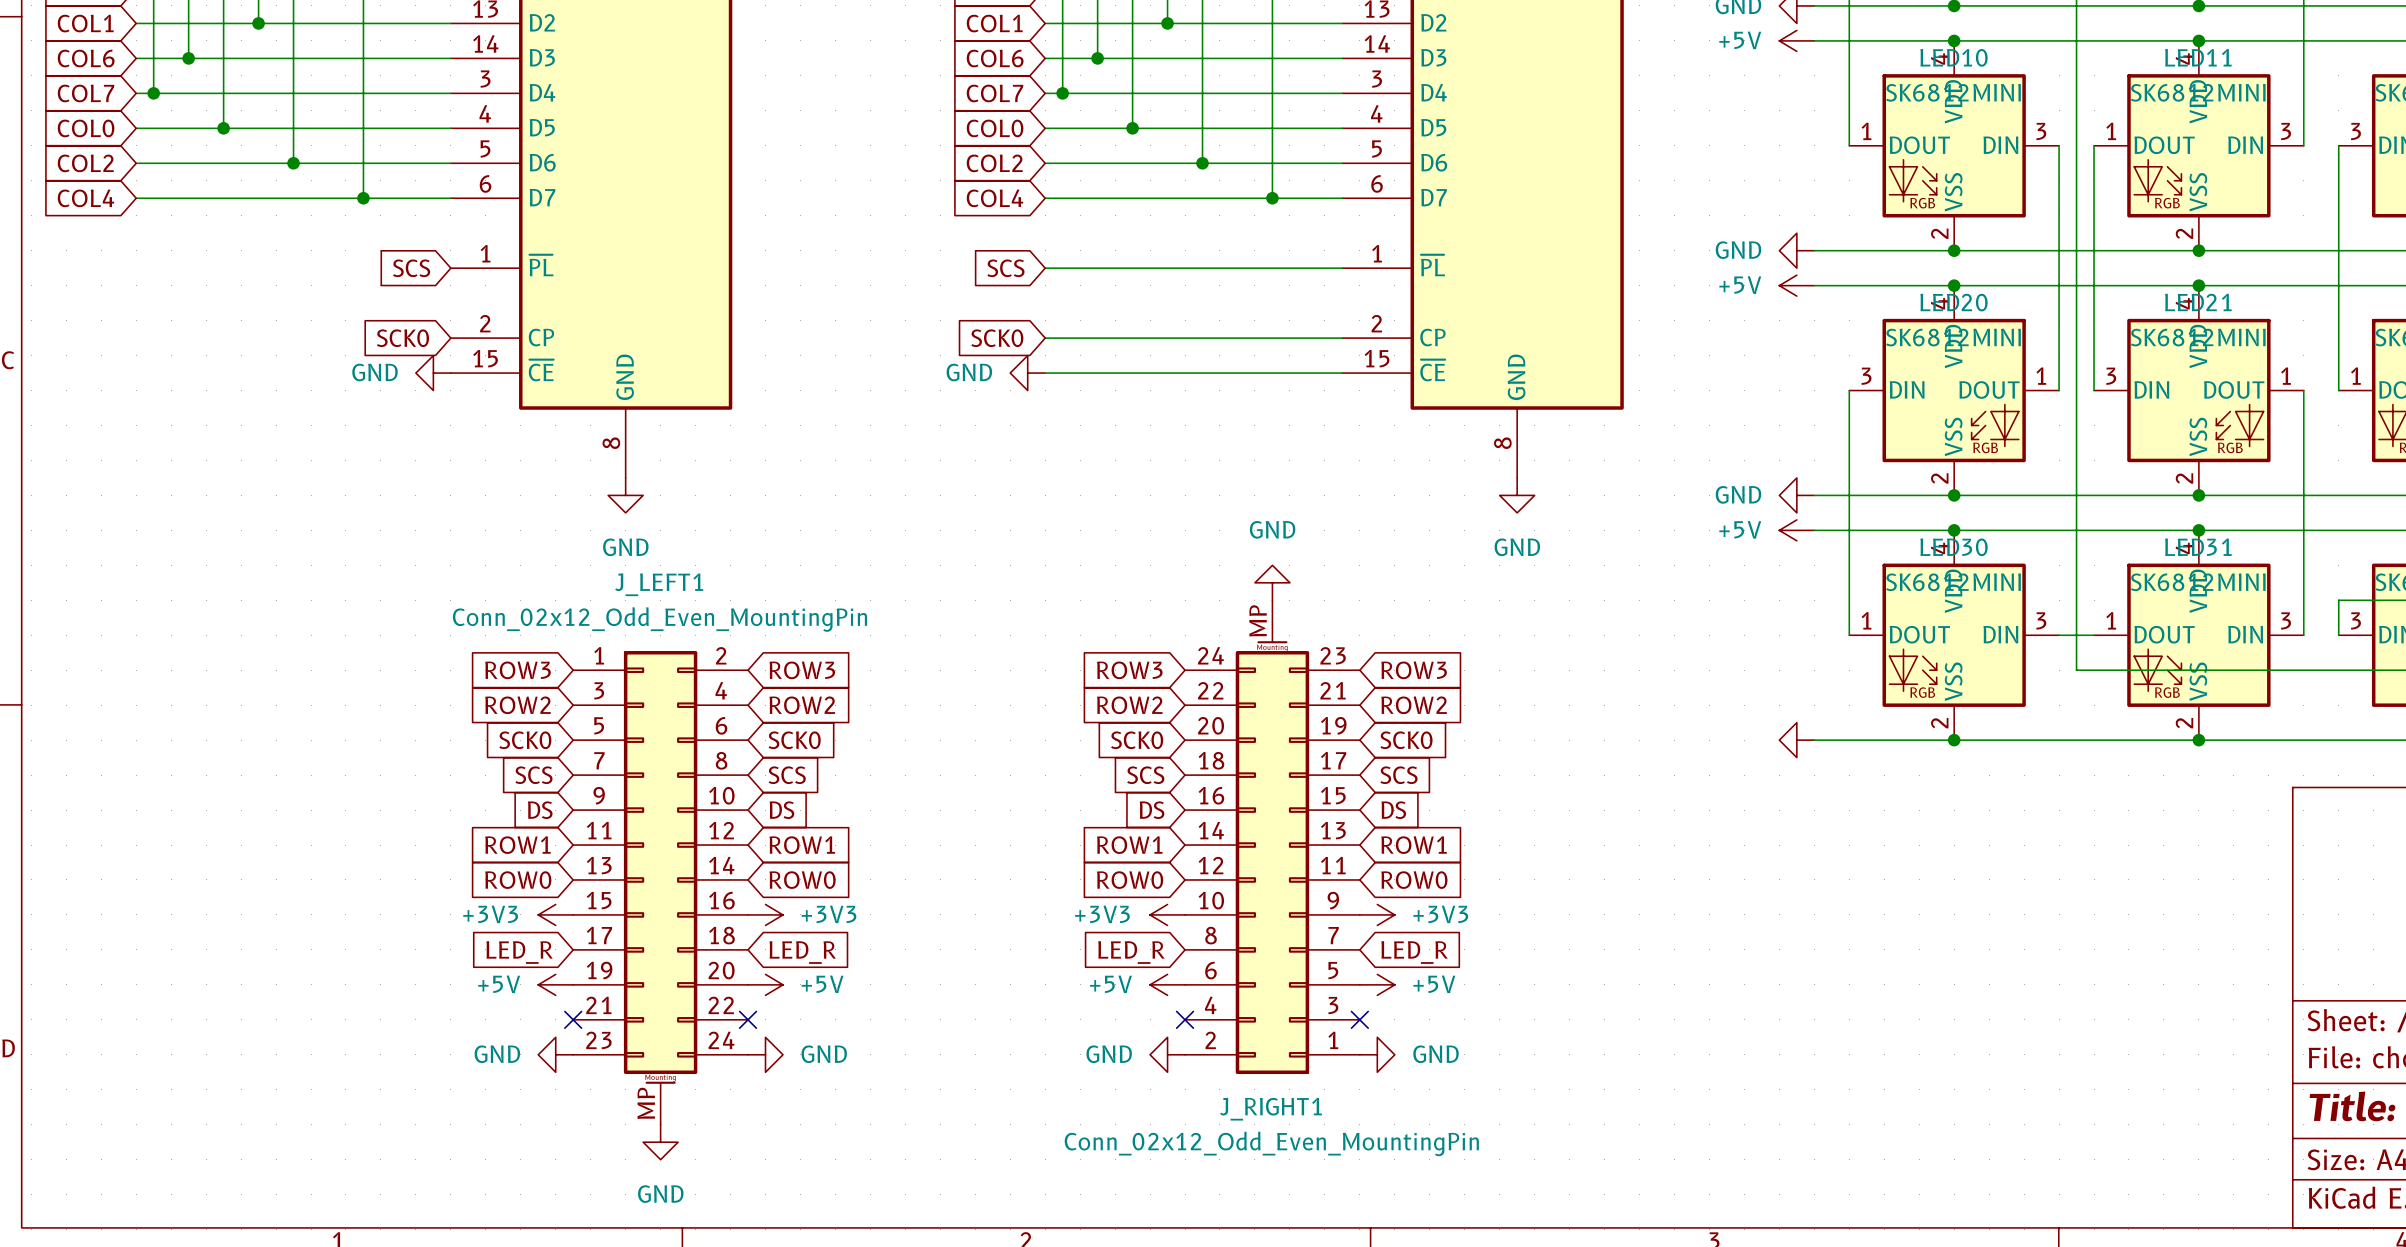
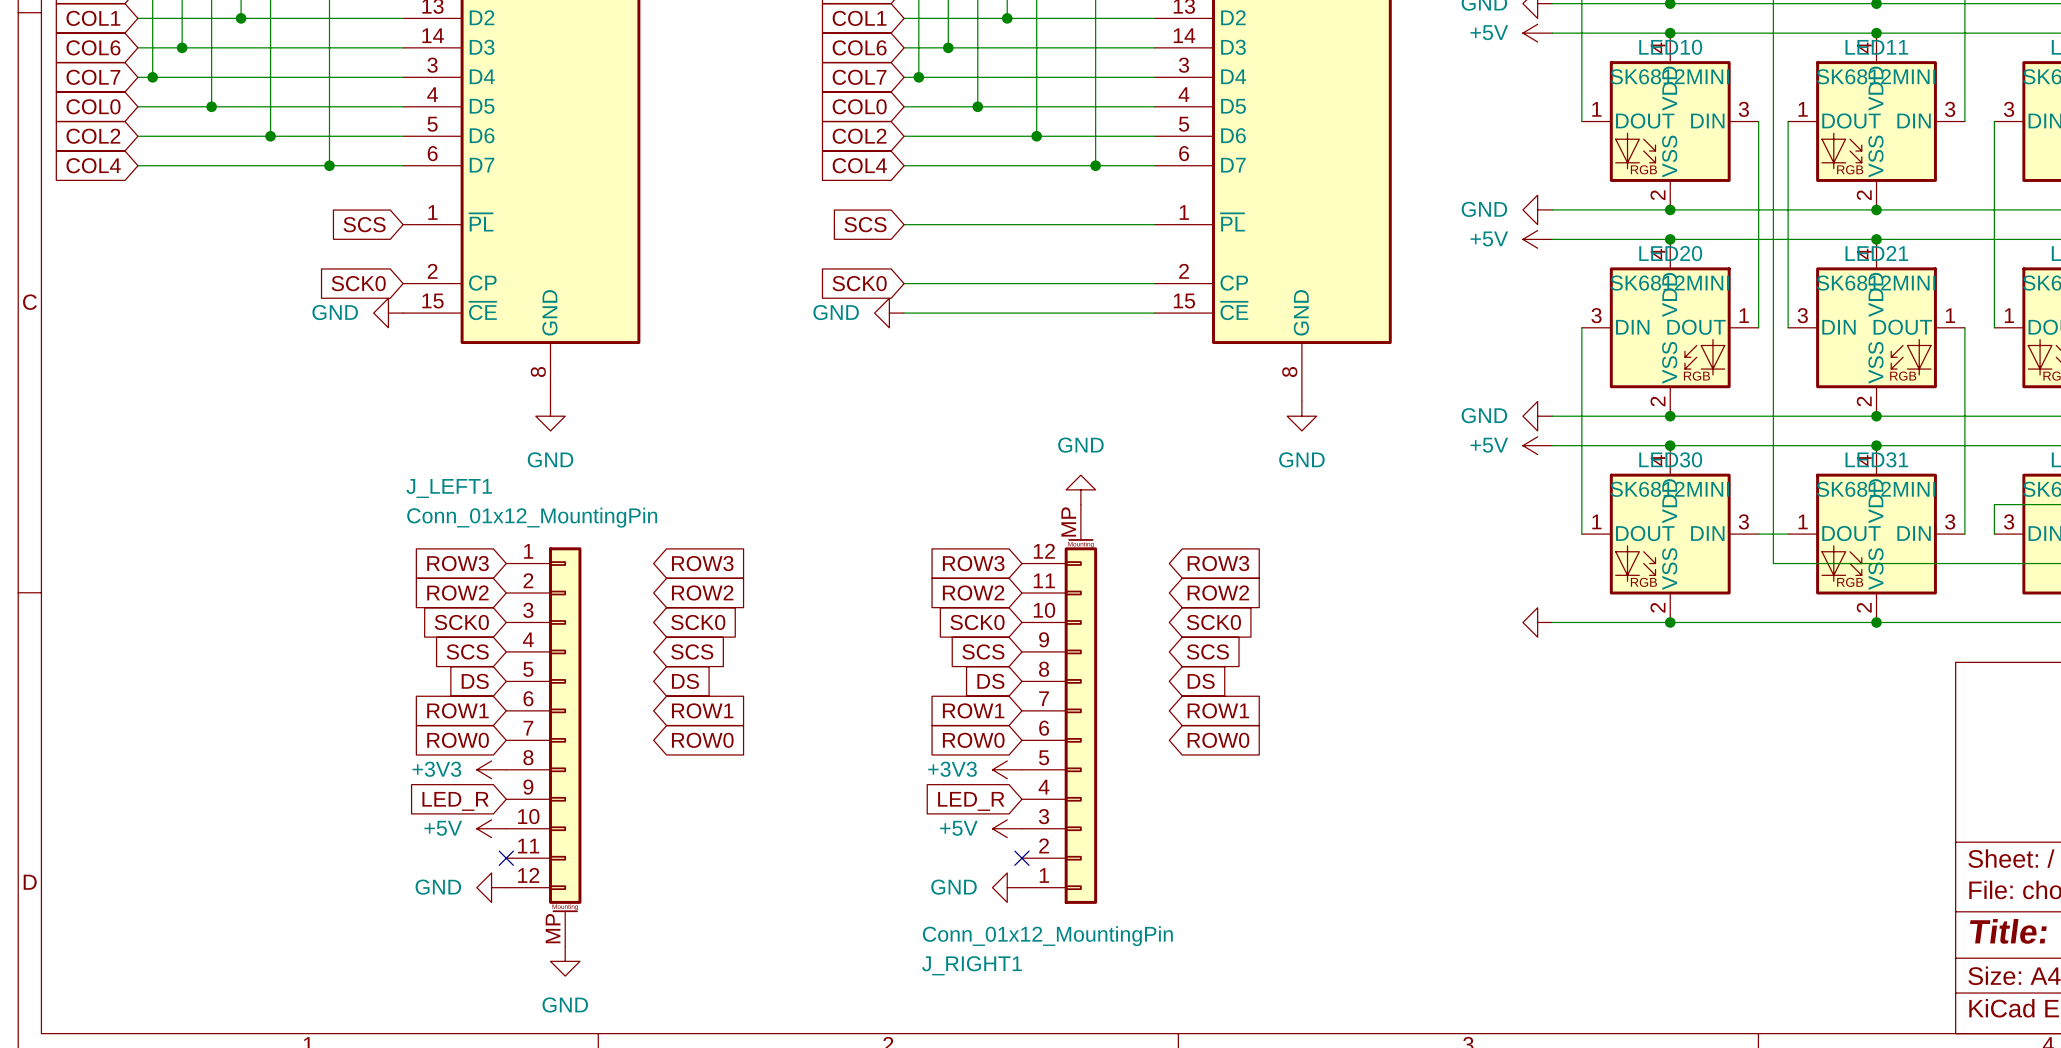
power symbol position: GND (1272, 582) -> GND (1080, 489)
J_LEFT1 name position: J_LEFT1 (659, 584) -> J_LEFT1 (449, 488)
J_RIGHT1 symbol: [1185, 600, 1360, 1075] -> [1021, 504, 1098, 904]
J_LEFT1 value: Conn_02x12_Odd_Even_MountingPin (659, 619) -> Conn_01x12_MountingPin (532, 517)
J_LEFT1 symbol: [573, 650, 749, 1125] -> [506, 547, 582, 947]
power symbol: +3V3 (765, 914) -> none
power symbol: +3V3 (1377, 914) -> none
global label: LED_R (802, 952) -> none
global label: LED_R (1414, 952) -> none
power symbol: +5V (765, 984) -> none
power symbol: +5V (1377, 984) -> none
no-connect mark: (748, 1019) -> none
no-connect mark: (1359, 1019) -> none
power symbol: GND (765, 1054) -> none
power symbol: GND (1377, 1054) -> none
J_RIGHT1 name position: J_RIGHT1 (1270, 1109) -> J_RIGHT1 (972, 965)
power symbol position: GND (660, 1142) -> GND (565, 961)
J_RIGHT1 value: Conn_02x12_Odd_Even_MountingPin (1271, 1143) -> Conn_01x12_MountingPin (1047, 936)

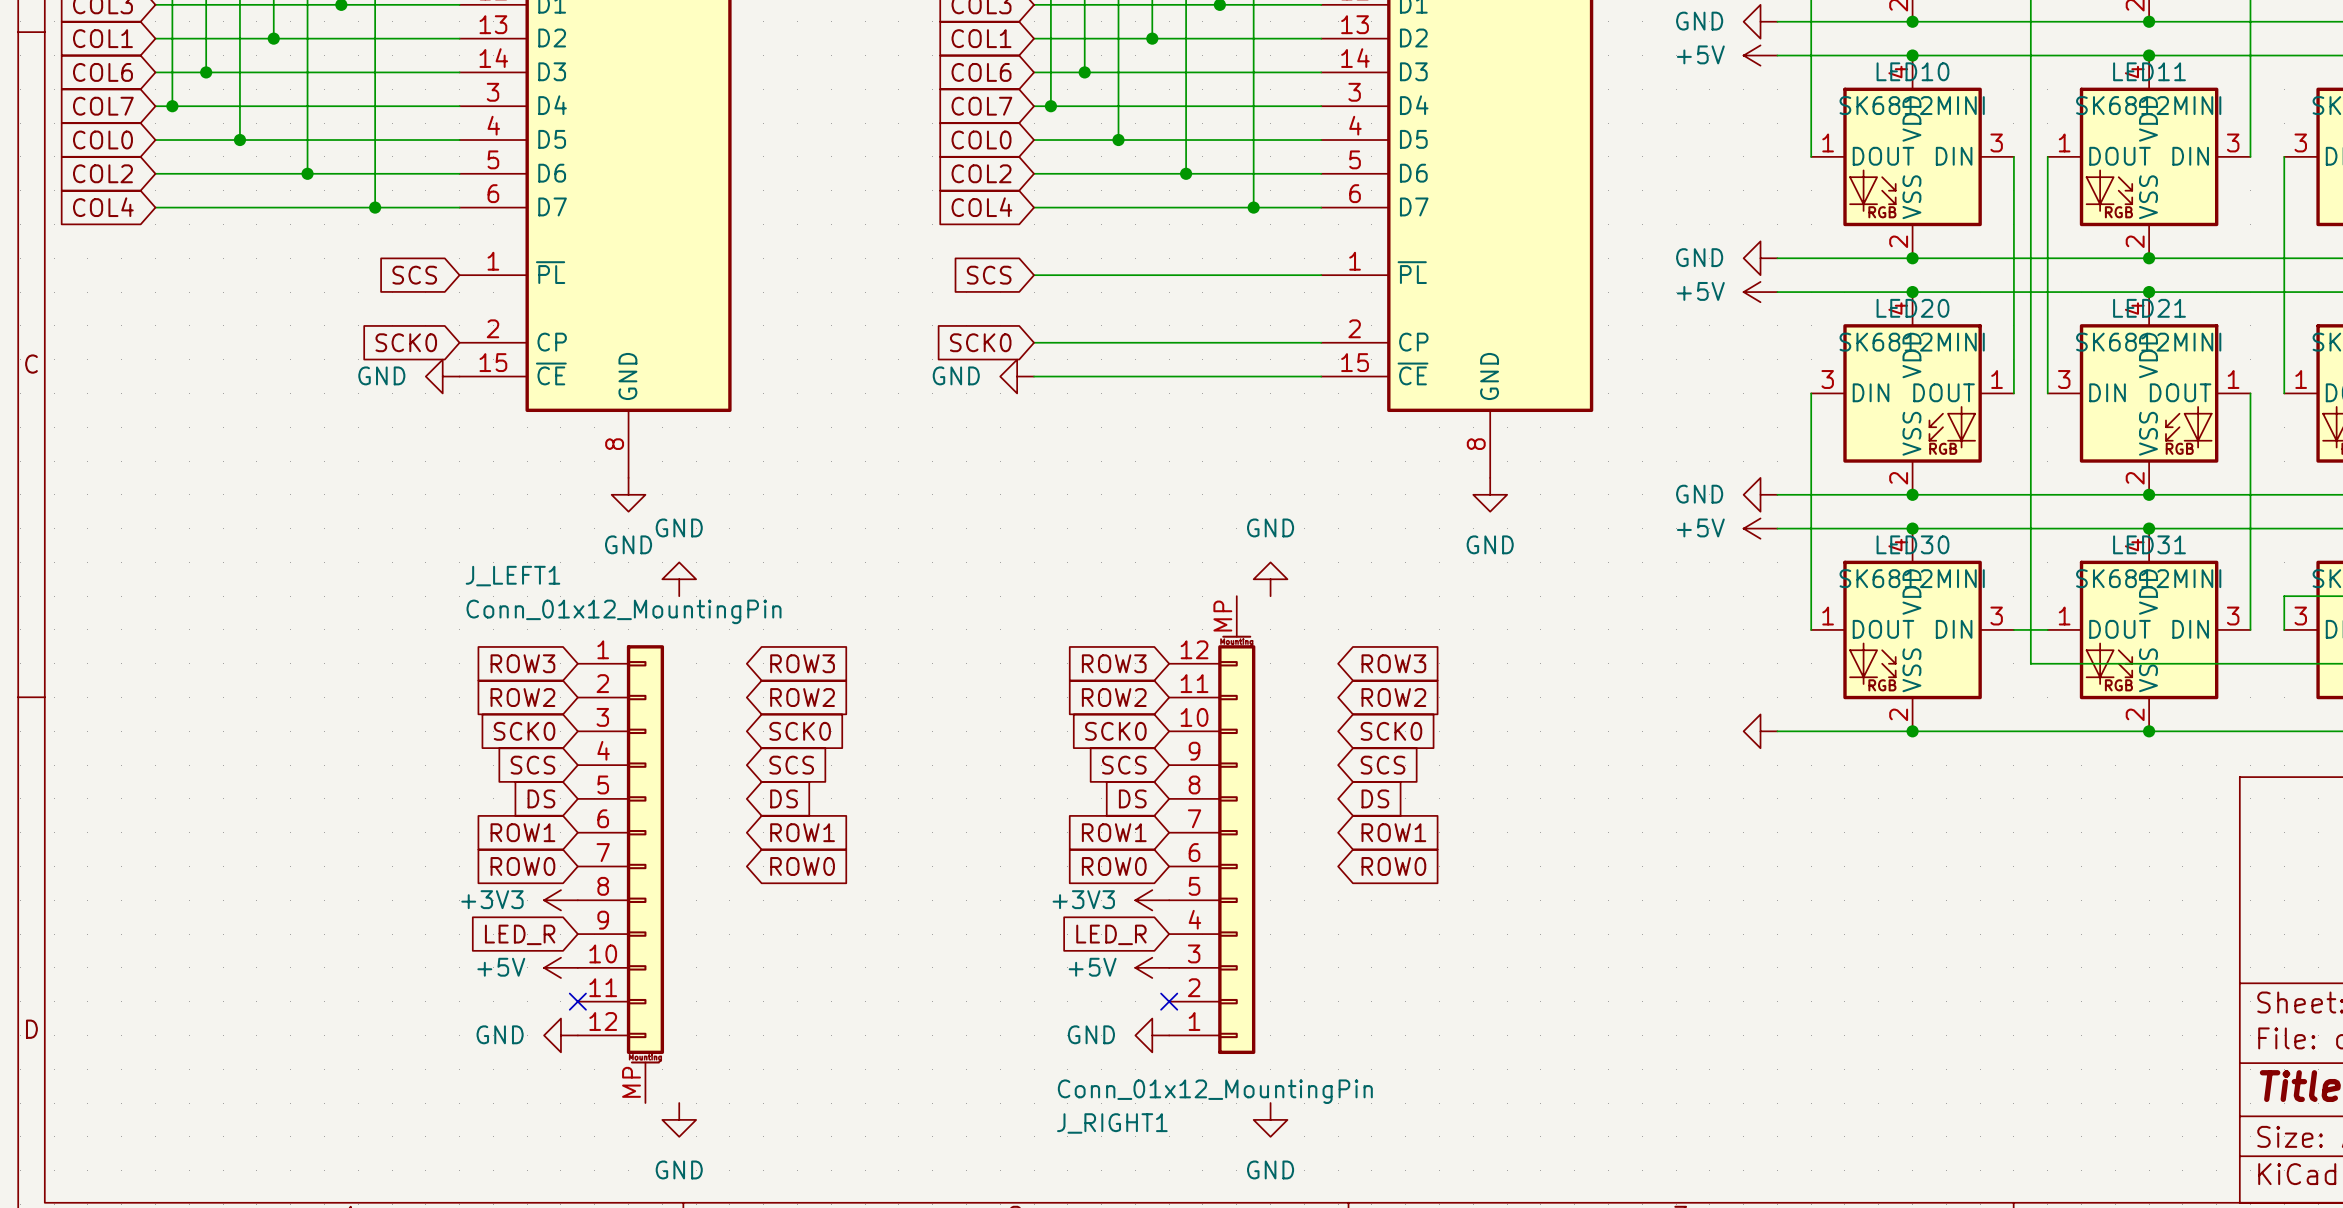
power symbol: none -> GND (679, 579)
power symbol position: GND (1080, 489) -> GND (1270, 579)
power symbol position: GND (565, 961) -> GND (679, 1119)
power symbol: none -> GND (1270, 1119)

